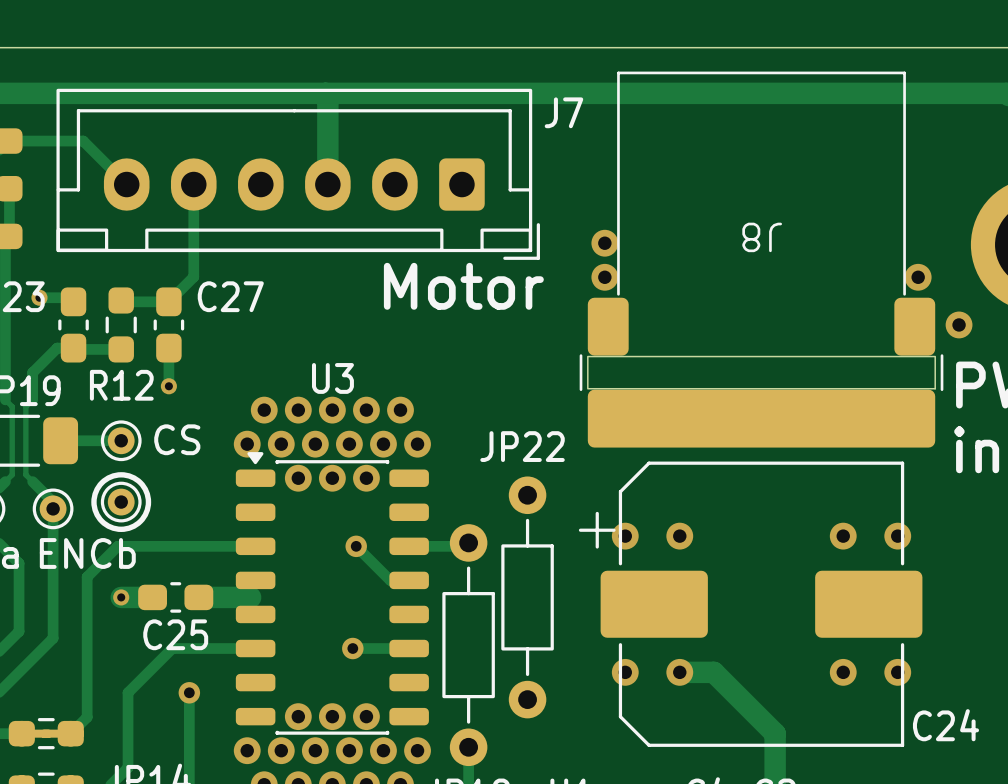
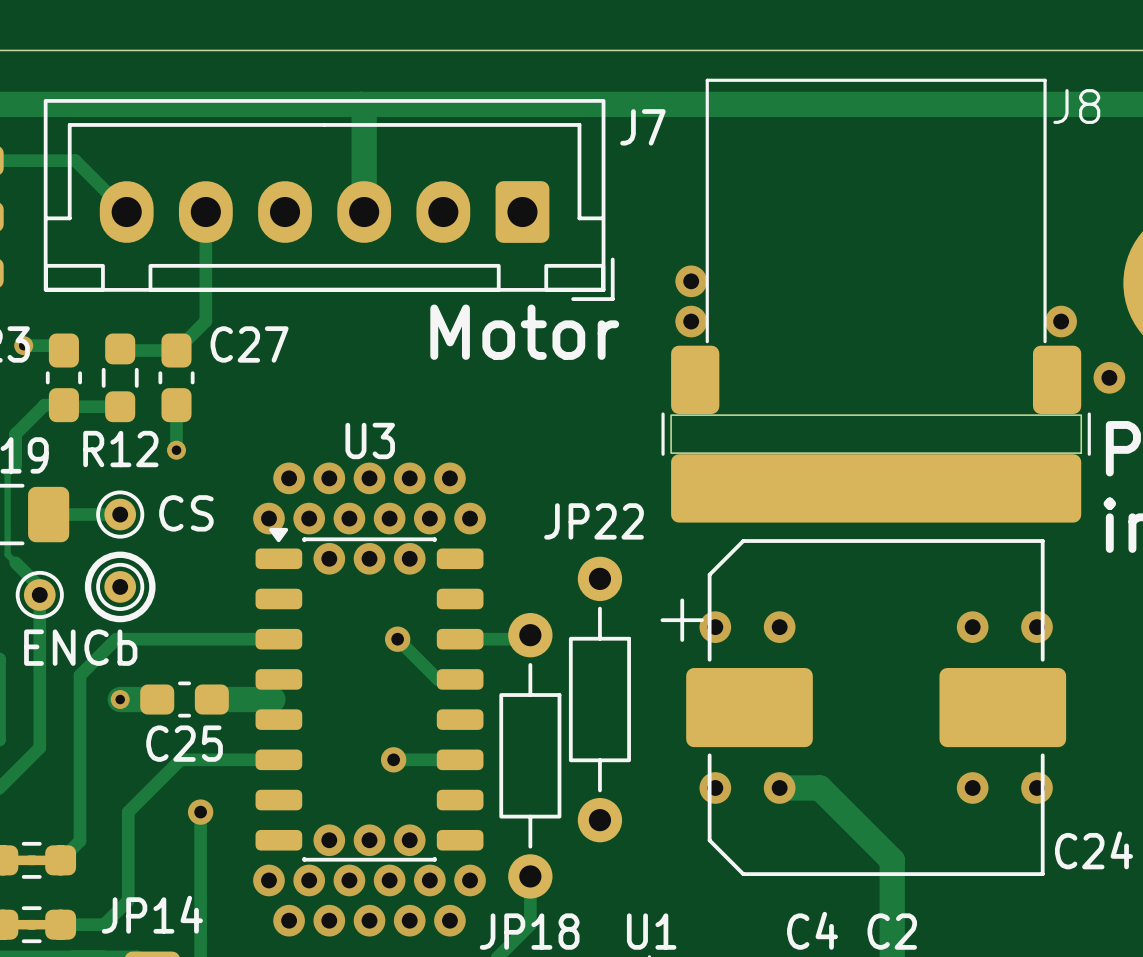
J8 name rotation: 0° (762, 237) -> 180° (1076, 106)
J8 name position: J8 (762, 237) -> J8 (1076, 106)

